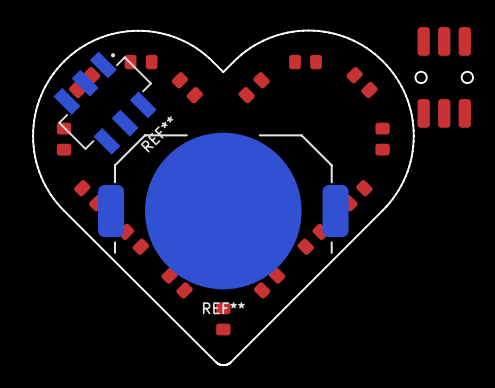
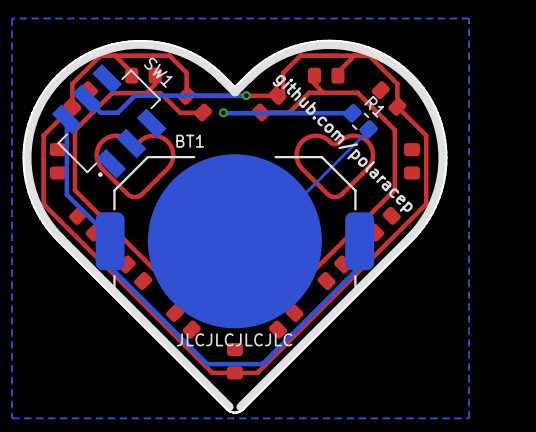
bottom zone outline: none -> (469, 18) (12, 18) (12, 418) (469, 418) (469, 18)
top track: none -> (114, 55) (131, 72) (131, 75)
top track: none -> (354, 55) (337, 72) (337, 75)
top track: none -> (369, 55) (300, 55) (283, 73) (283, 95) (186, 95) (186, 72) (169, 55) (100, 55) (72, 83) (72, 106) (43, 135) (43, 204) (212, 372) (257, 372) (426, 204) (426, 135) (397, 106) (397, 83) (369, 55)
top track: none -> (155, 76) (155, 84) (146, 93)
top track: none -> (314, 75) (314, 83) (323, 92)
line: none -> (249, 77) (235, 91) (206, 65) (190, 55) (172, 49) (145, 44) (126, 45) (107, 49) (82, 60) (67, 71) (53, 84) (42, 100) (34, 117) (29, 134) (27, 153) (28, 172) (35, 199) (43, 216) (54, 231) (229, 406)
line: none -> (248, 78) (270, 60) (287, 52) (314, 45) (333, 44) (352, 47) (378, 56) (394, 65) (409, 77) (421, 91) (431, 108) (440, 134) (442, 153) (440, 181) (435, 199) (426, 216) (409, 238)
part: (444, 77) -> none
bottom track: none -> (246, 95) (134, 95) (117, 112) (100, 112) (87, 99)
via: none -> (246, 95)
top track: none -> (203, 112) (180, 112) (160, 93) (112, 93) (74, 130) (74, 190) (198, 313)
bottom track: none -> (223, 112) (352, 113)
via: none -> (223, 112)
top track: none -> (266, 112) (289, 112) (309, 92) (357, 92) (394, 129) (394, 189) (271, 312)
bottom track: none -> (66, 119) (66, 194) (110, 237) (110, 266) (207, 364) (262, 364) (359, 266) (359, 237)
REF**: (105, 103) -> none
SW1: none -> (109, 121)
R1: none -> (360, 121)
bottom track: none -> (368, 129) (257, 241) (234, 241) (234, 237)
top track: none -> (140, 141) (151, 135) (163, 138) (170, 145) (172, 157) (169, 166) (142, 193) (133, 196) (127, 193) (100, 166) (96, 152) (100, 143) (111, 136) (121, 136) (134, 144) (140, 141)
top track: none -> (339, 141) (351, 135) (363, 138) (370, 145) (372, 157) (369, 166) (342, 193) (333, 196) (327, 193) (300, 167) (296, 153) (300, 143) (310, 136) (321, 136) (334, 144) (339, 141)
text: none -> github.com/polaracep (342, 143)
line: none -> (413, 234) (240, 406)
text: none -> JLCJLCJLCJLC (234, 339)
REF** name: REF** (223, 308) -> BT1 (190, 141)

